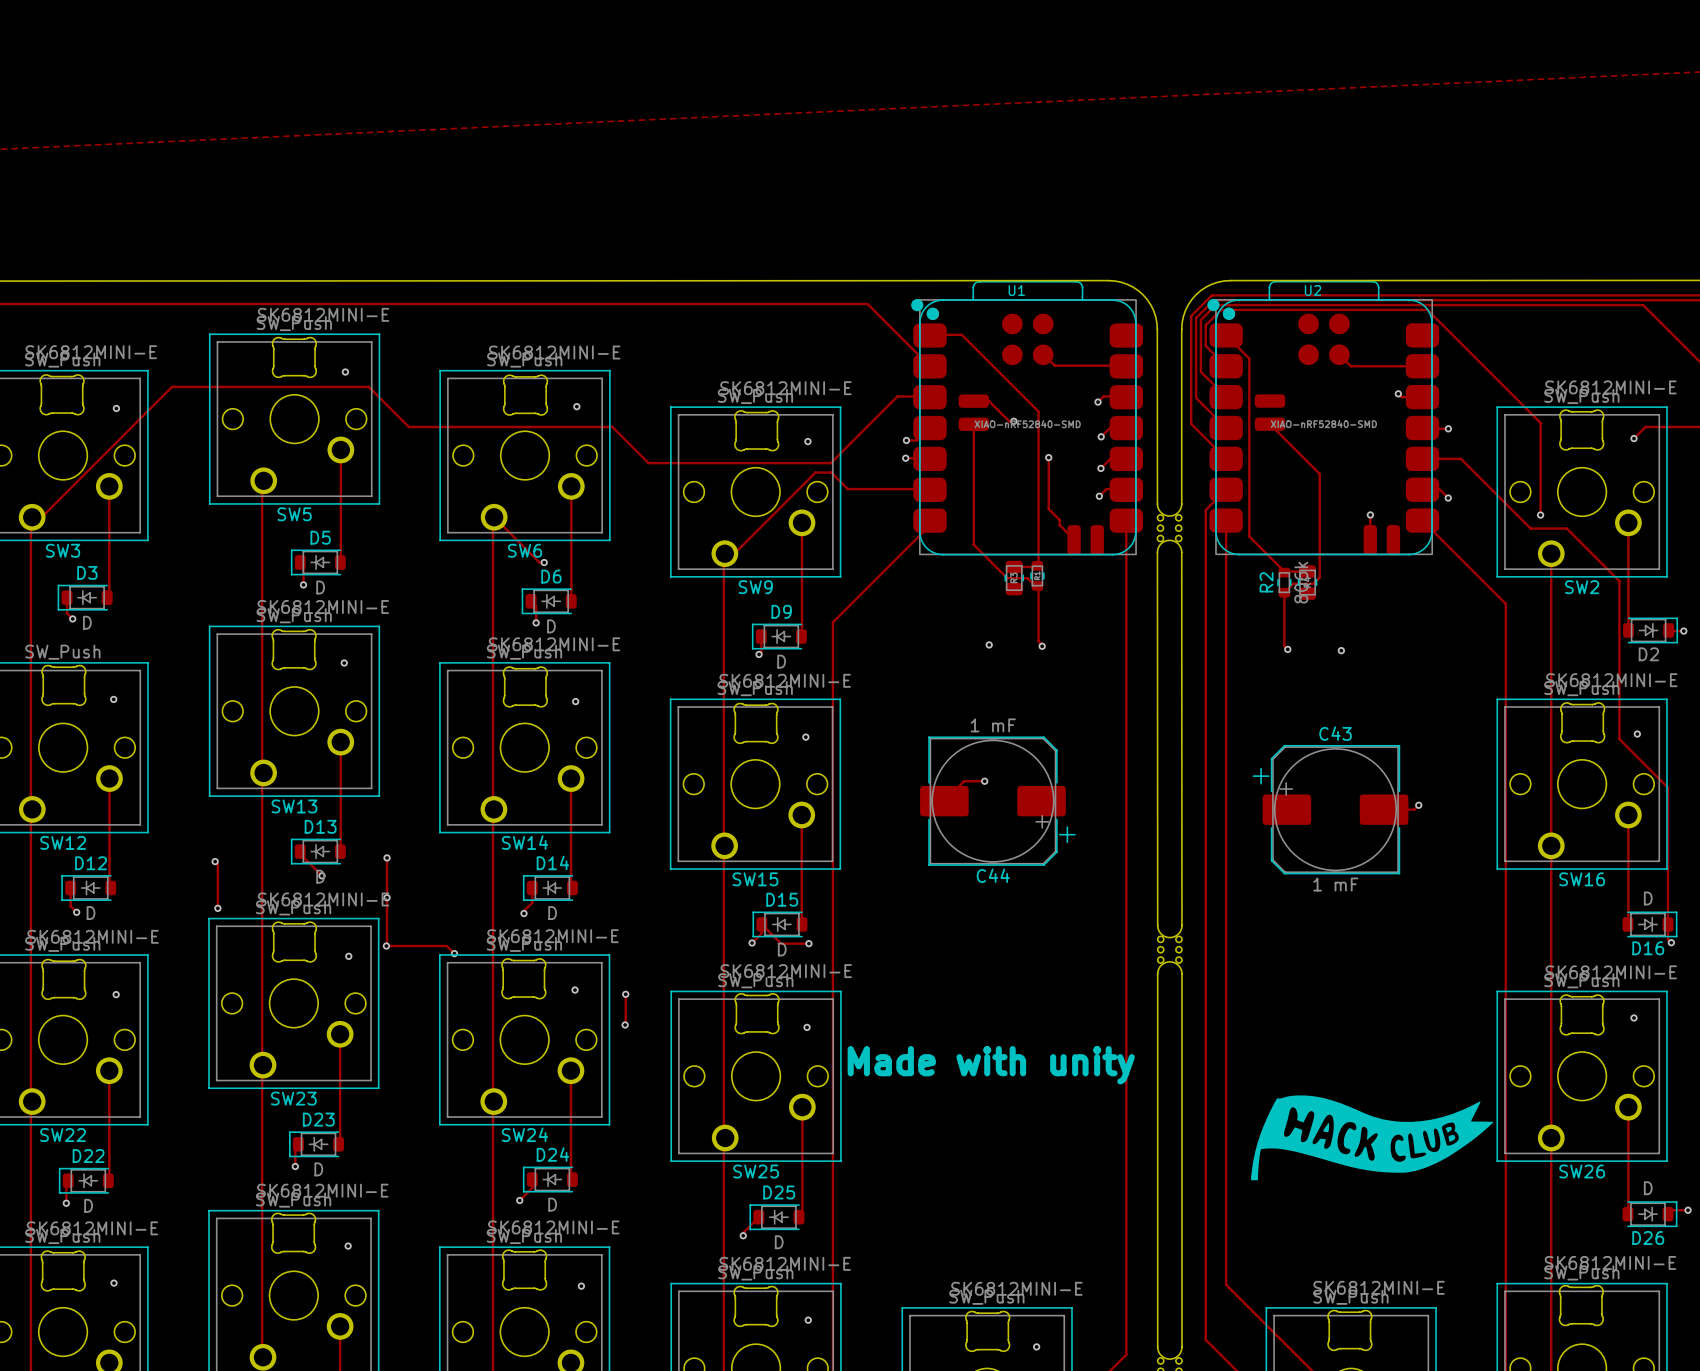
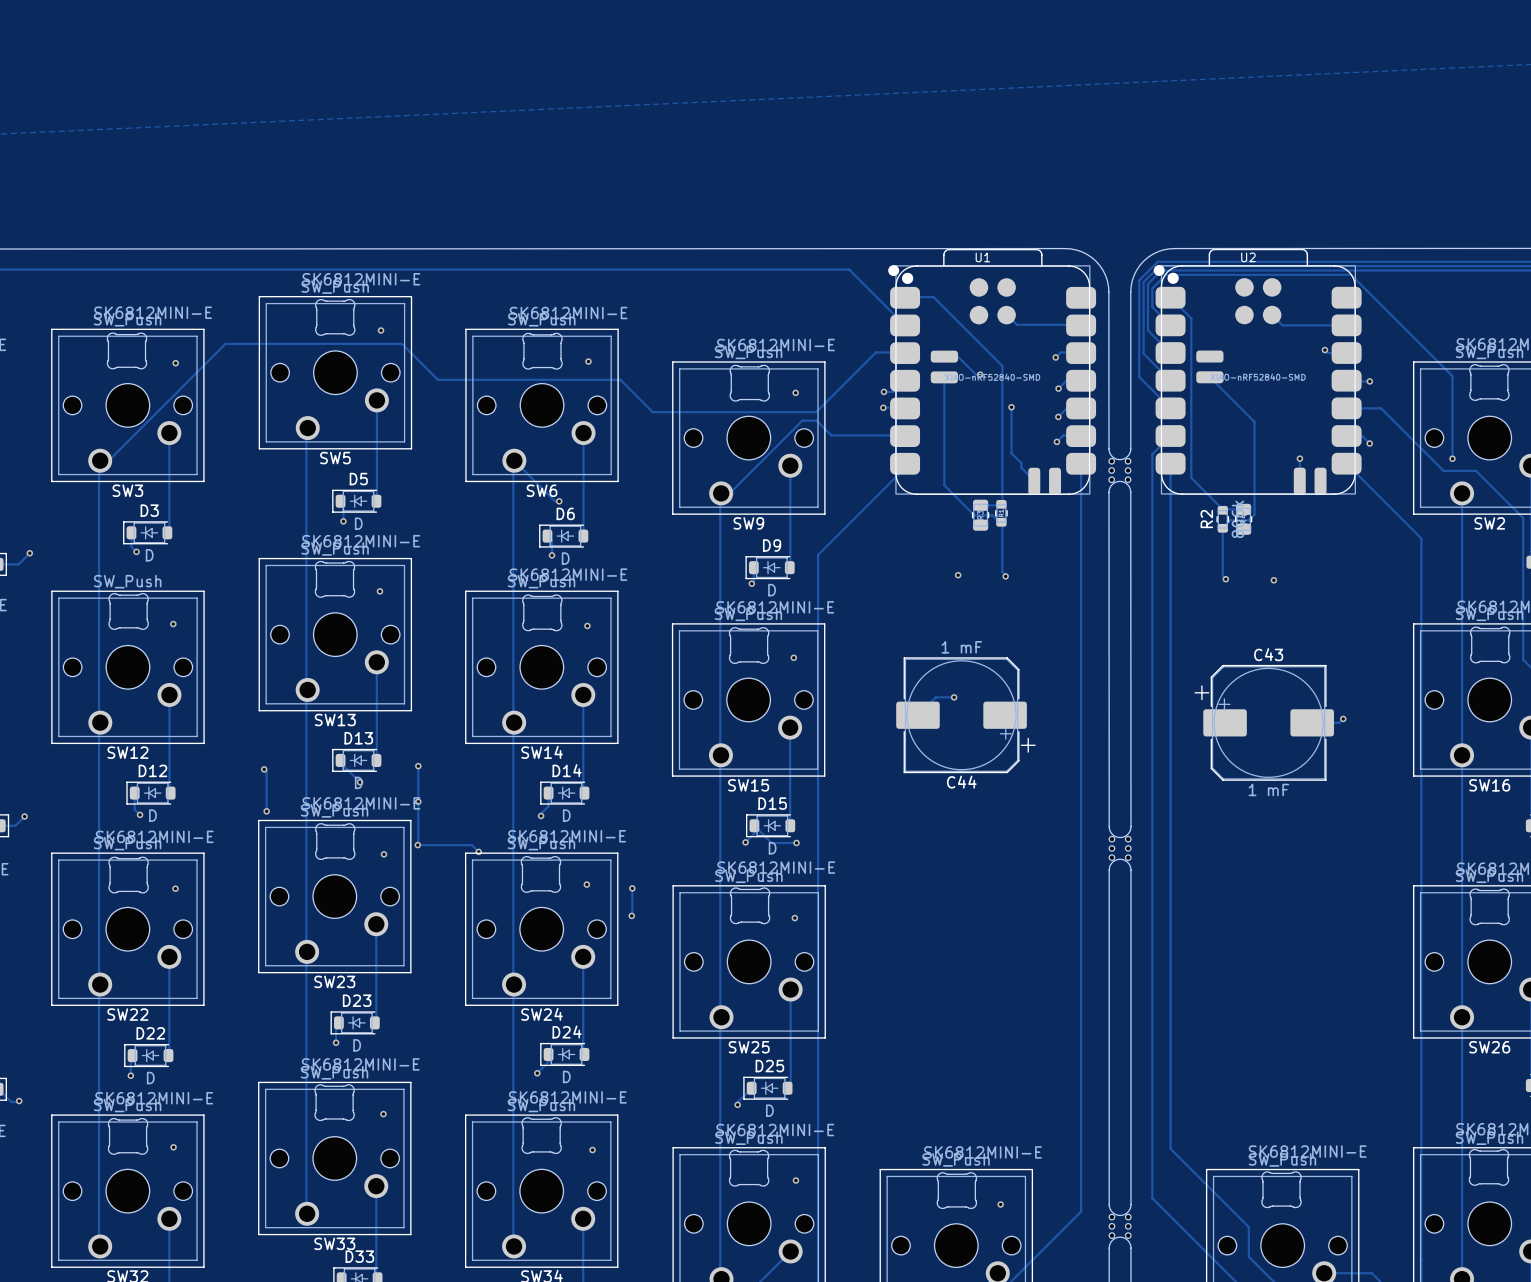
text: Made with unity (991, 1065) -> none
drawing: [1251, 1095, 1494, 1181] -> none

